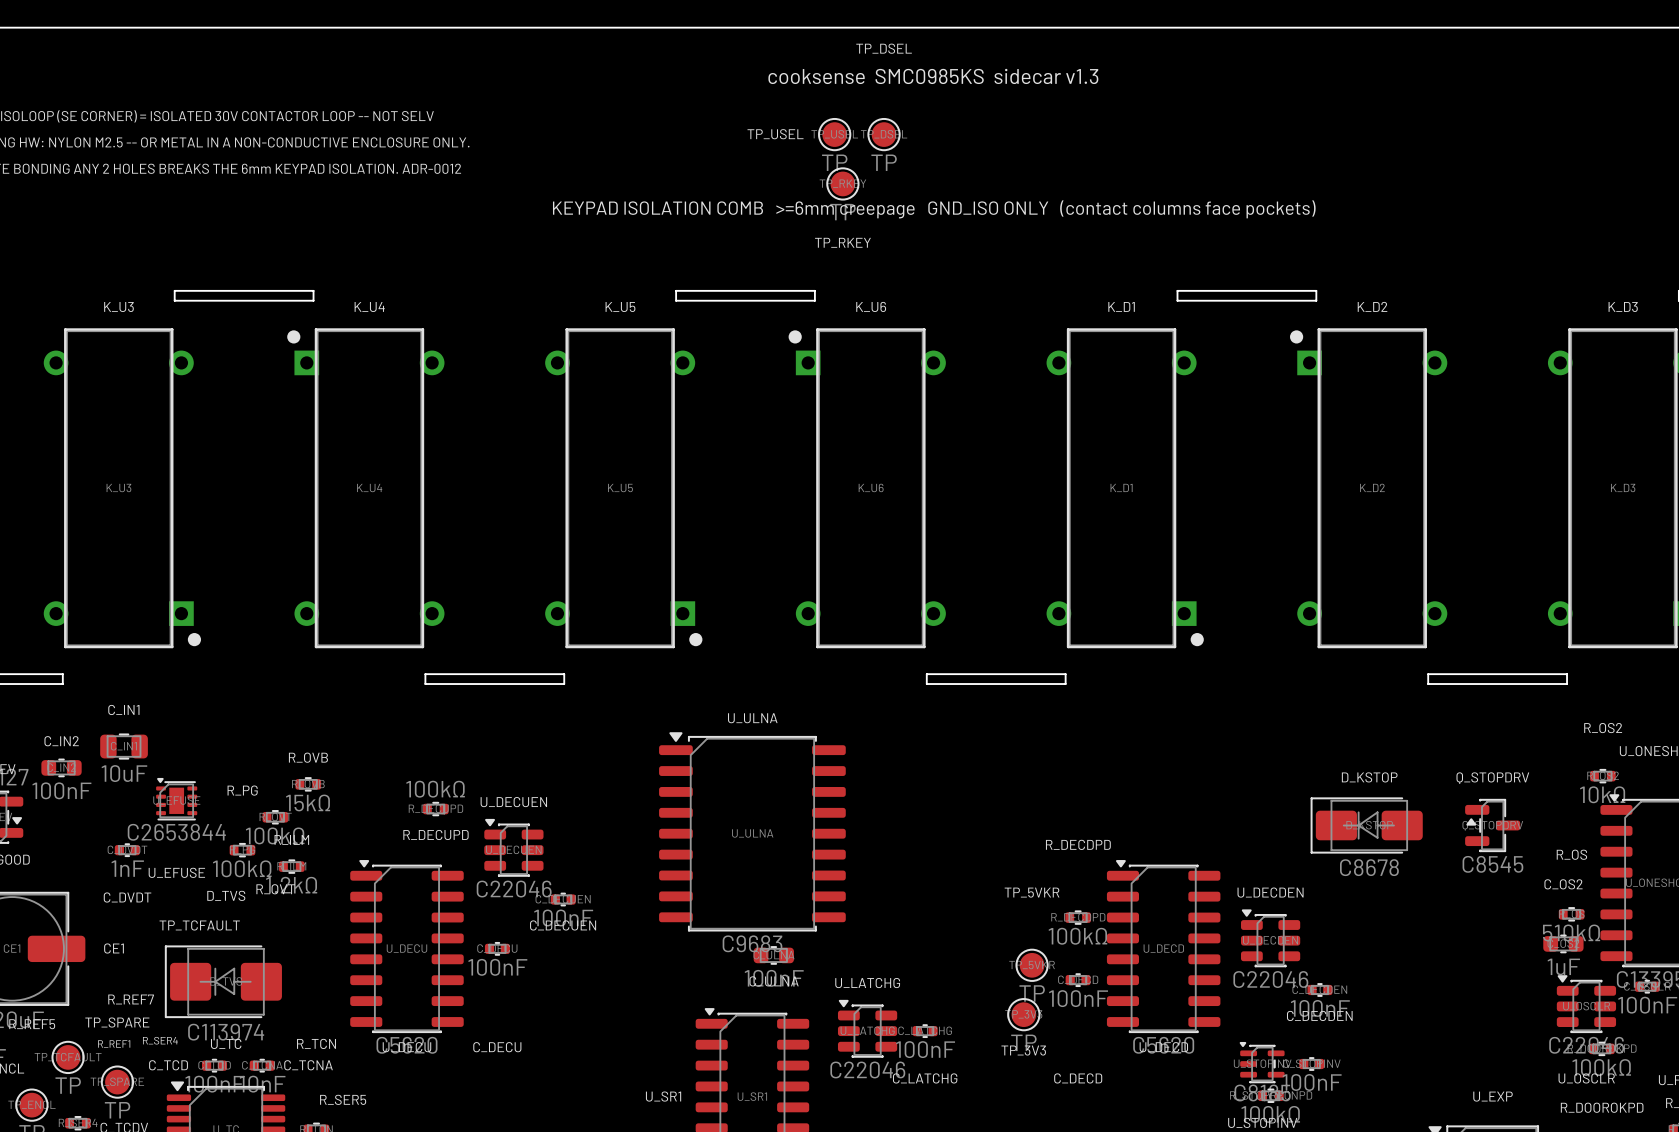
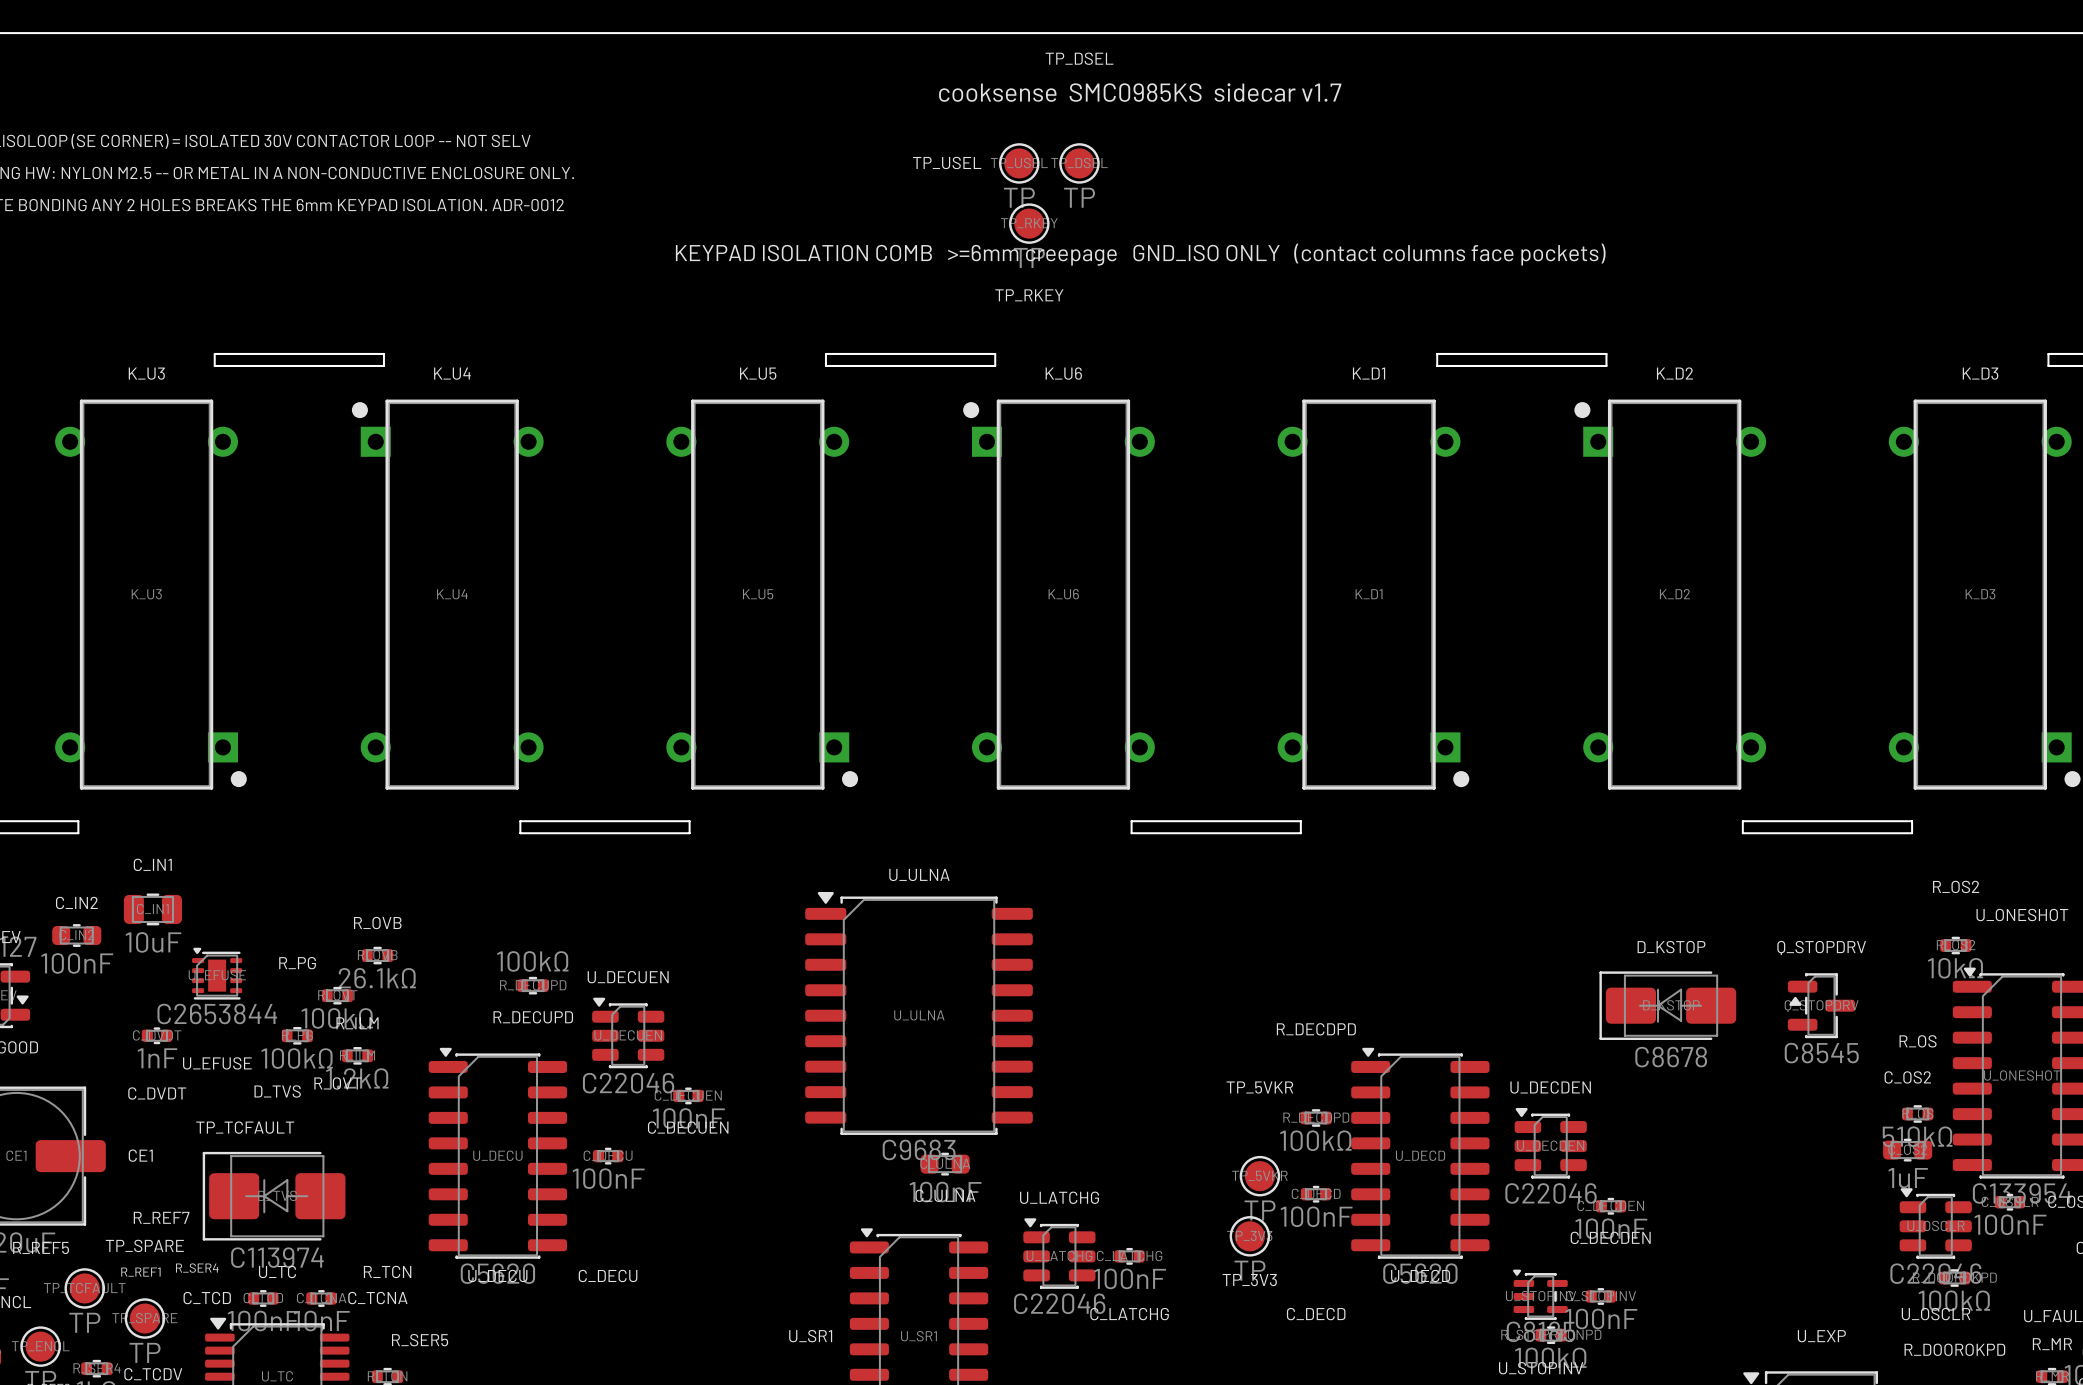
text: cooksense SMC0985KS sidecar v1.3 (933, 76) -> cooksense SMC0985KS sidecar v1.7 (1140, 92)
R_OVB value: 15kΩ (308, 802) -> 26.1kΩ (377, 978)

